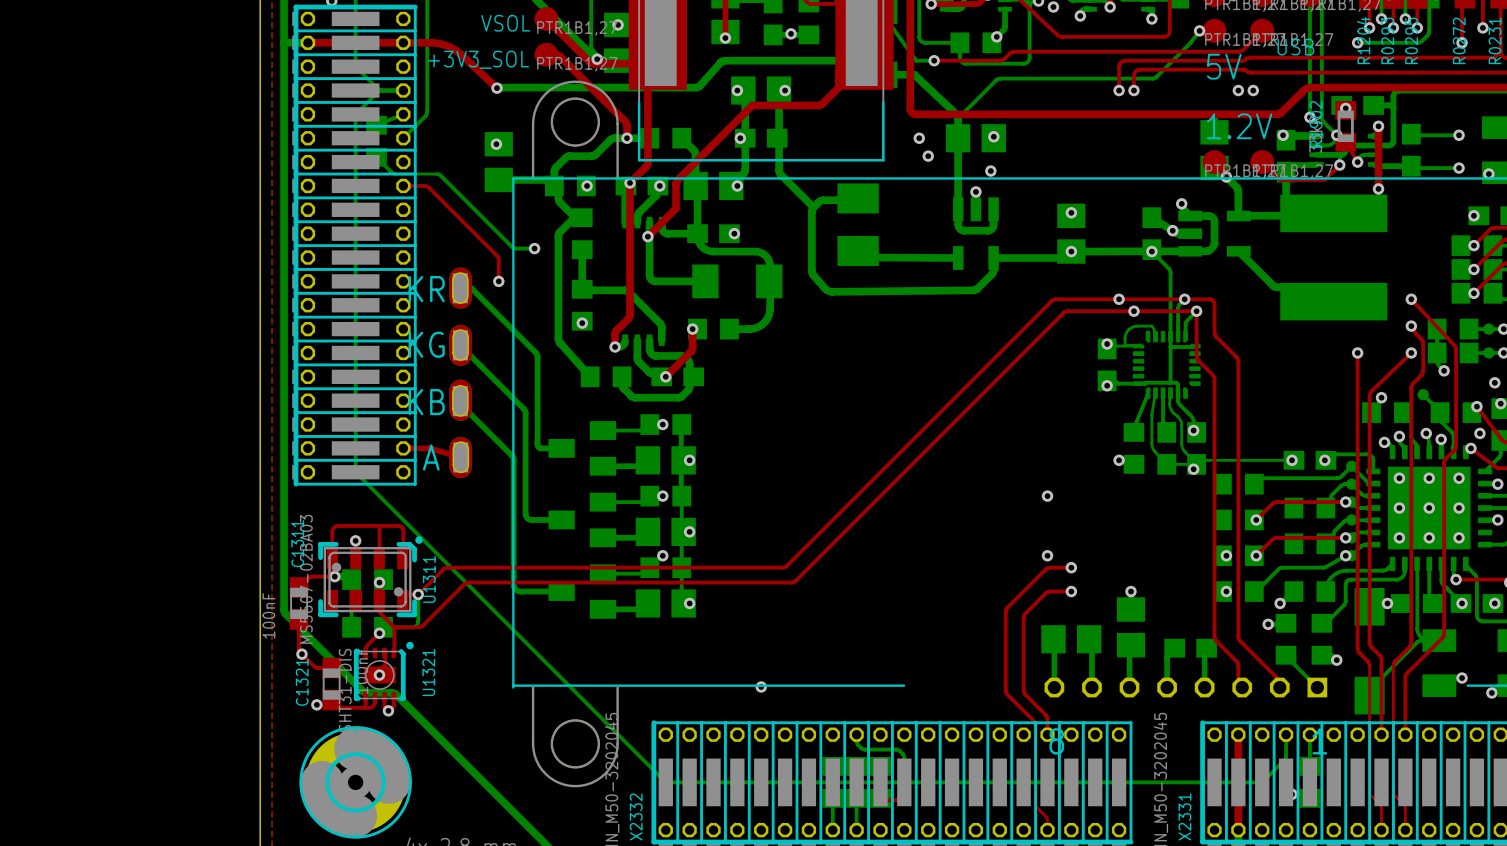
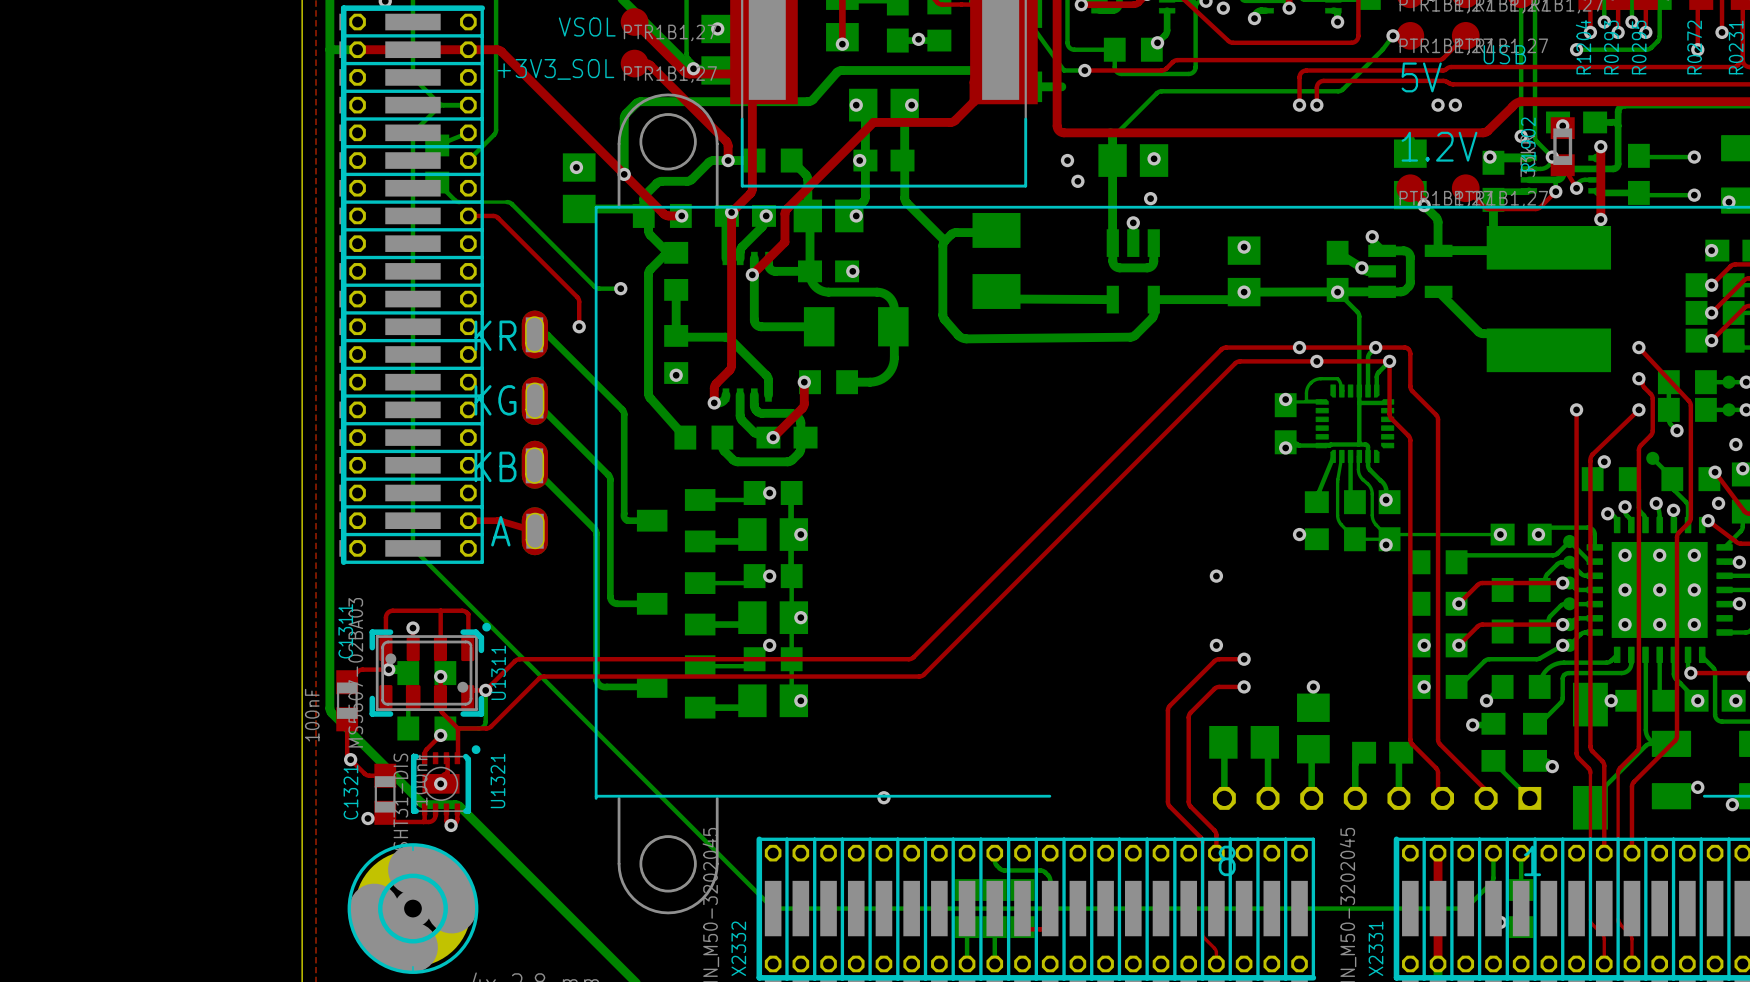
top track: (427, 42) (445, 45) (455, 50) (496, 88) -> (496, 49) (501, 51) (663, 213) (679, 215)
bottom track: (914, 74) (956, 114) -> none
bottom track: (551, 87) (496, 88) -> (640, 101) (636, 103) (624, 116) (624, 174)
via position: (496, 88) -> (624, 174)

